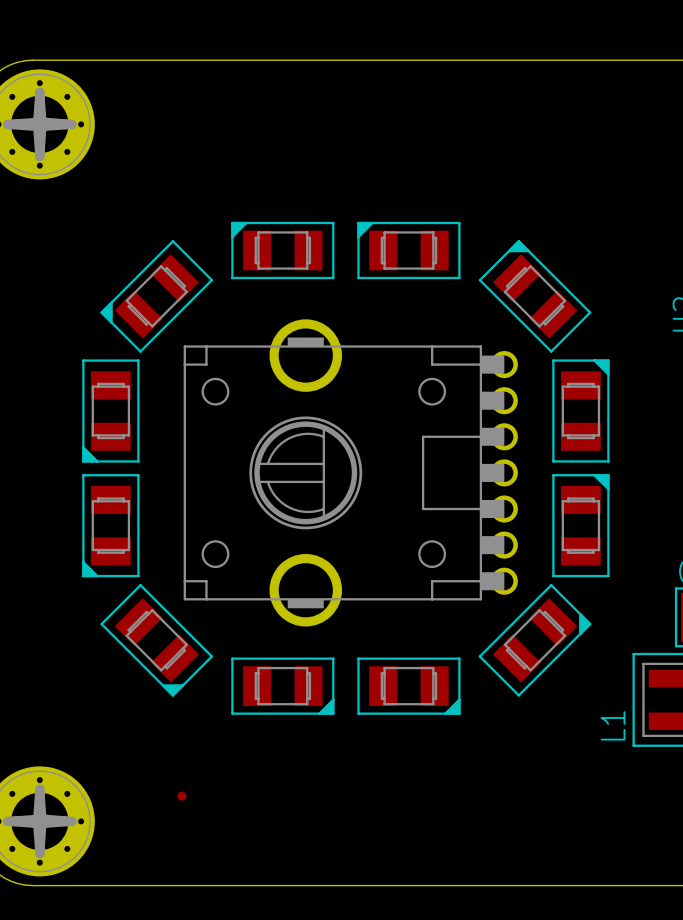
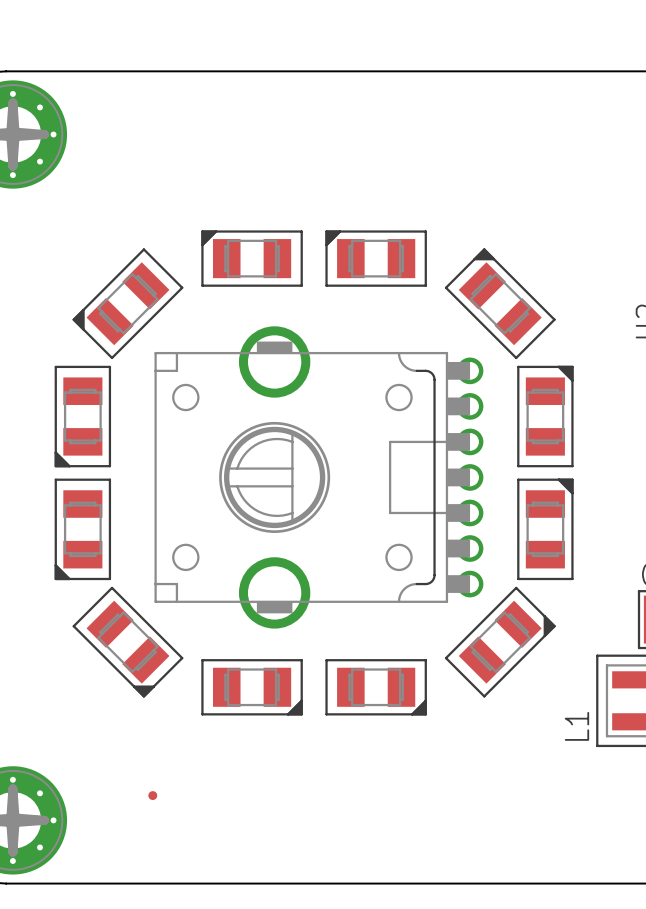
part footprint: [183, 319, 518, 627] -> [154, 326, 484, 629]

